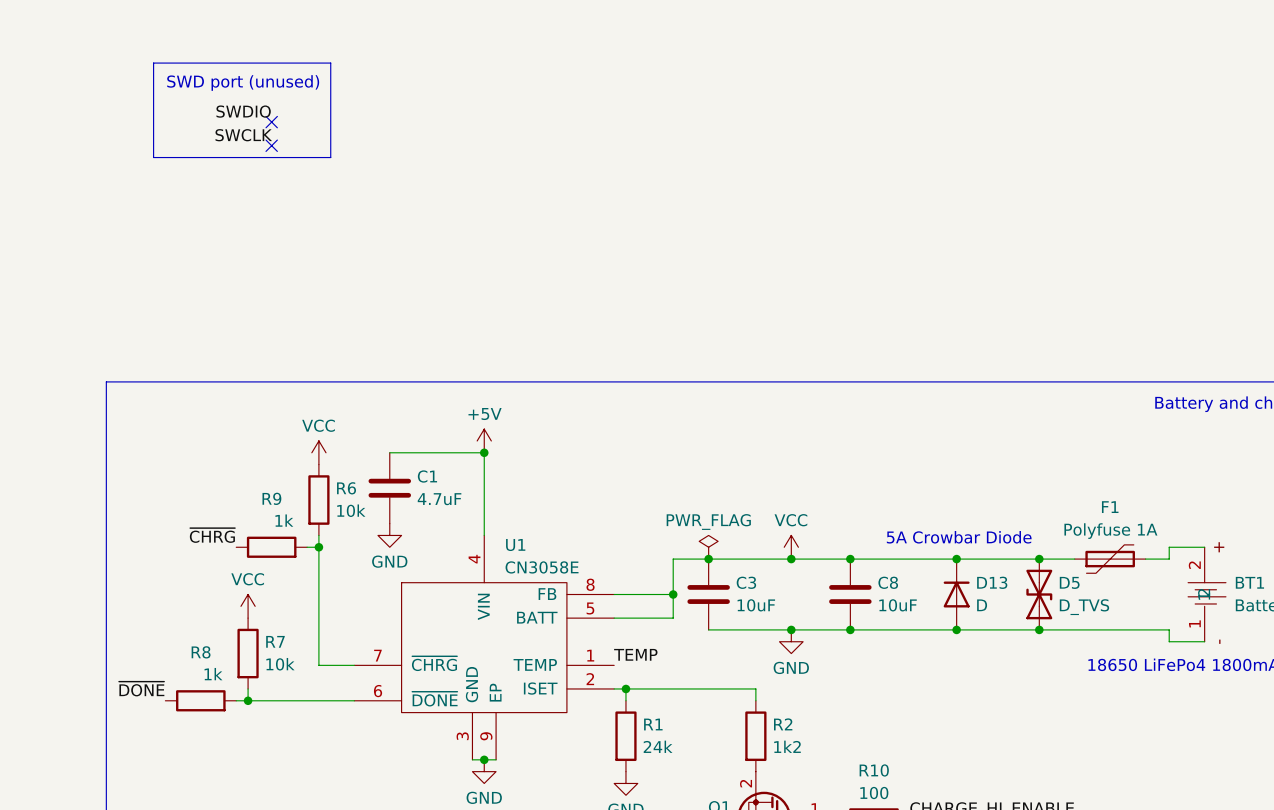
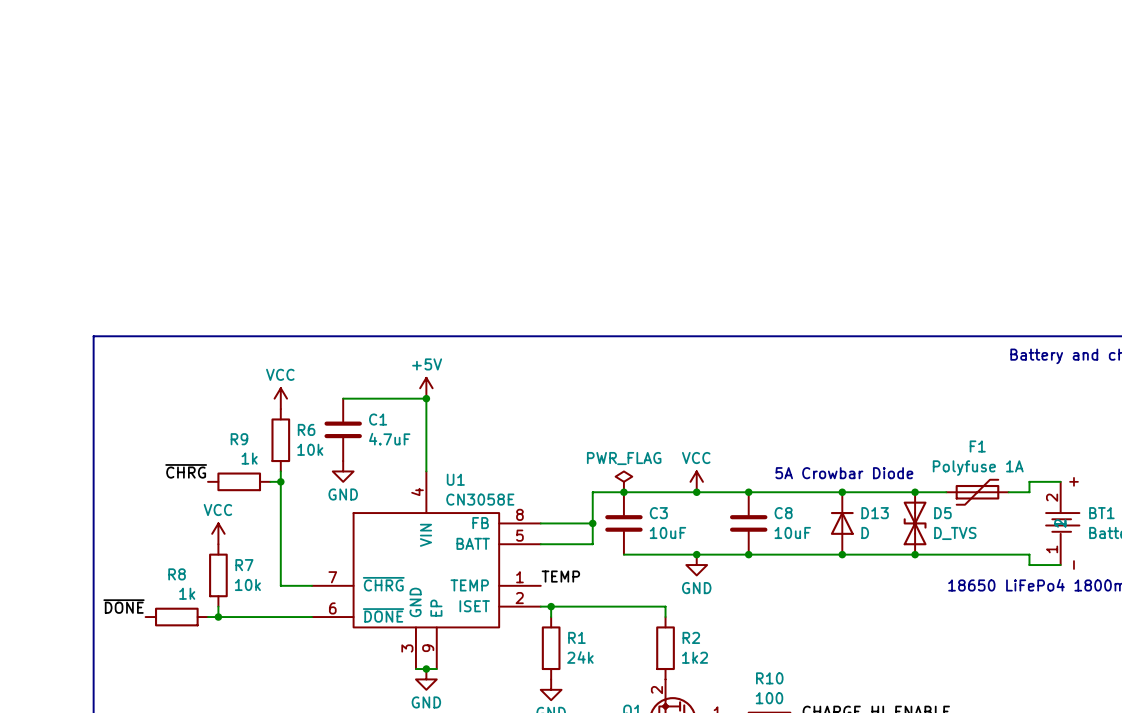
line: (153, 63) (153, 157) (330, 157) (330, 63) (153, 63) -> none
text: SWD port (unused) (243, 82) -> none
label: SWDIO (243, 111) -> none
no-connect mark: (271, 122) -> none
label: SWCLK (243, 135) -> none
no-connect mark: (271, 145) -> none

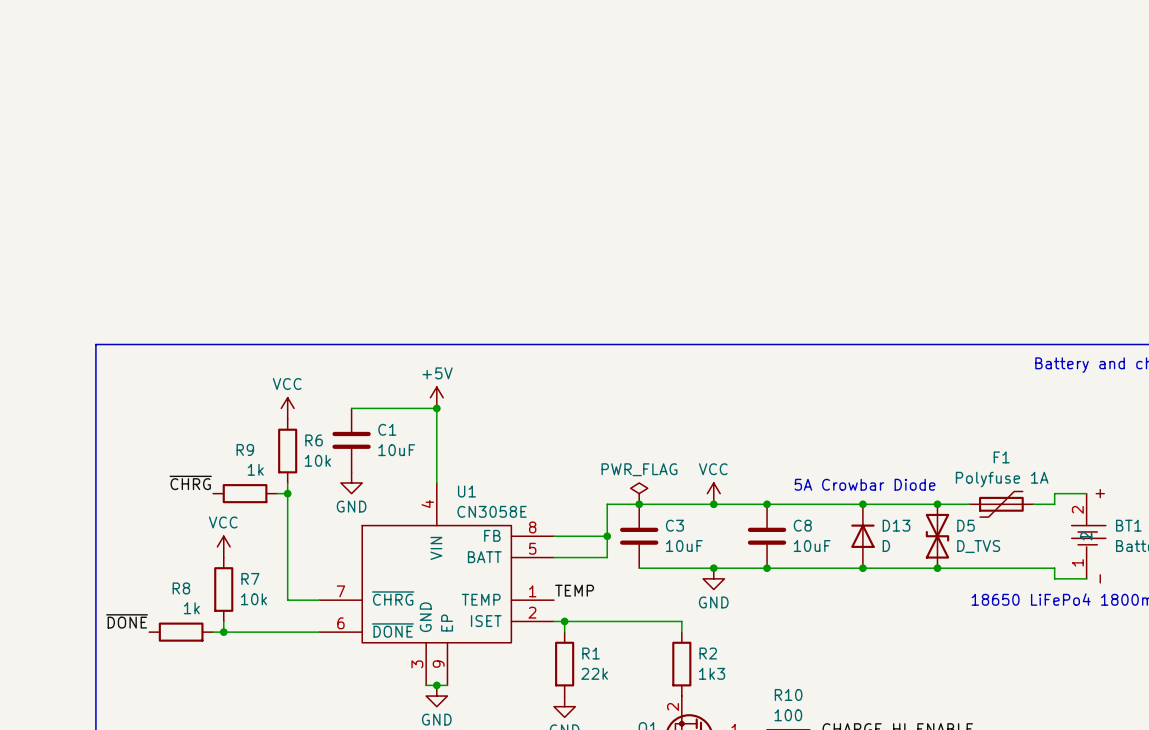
C1 value: 4.7uF (389, 439) -> 10uF (396, 450)
R1 value: 24k (580, 657) -> 22k (594, 673)
R2 value: 1k2 (695, 657) -> 1k3 (712, 673)

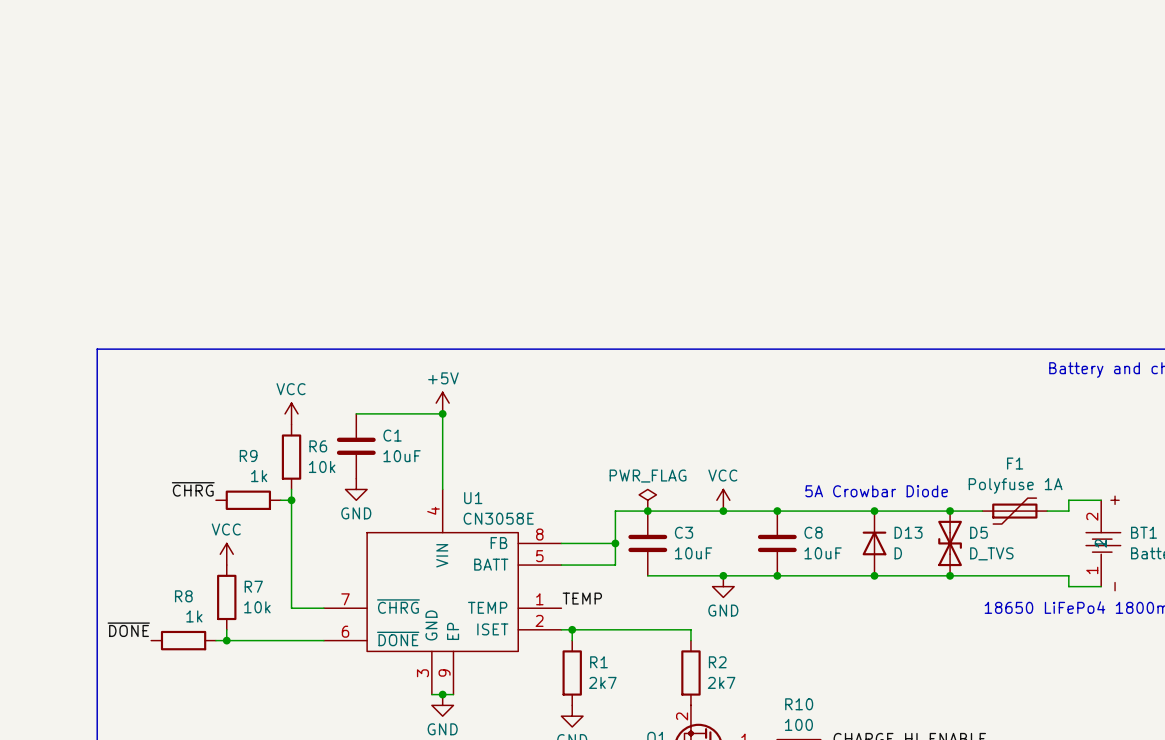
R1 value: 22k (594, 673) -> 2k7 (602, 682)
R2 value: 1k3 (712, 673) -> 2k7 (721, 682)

